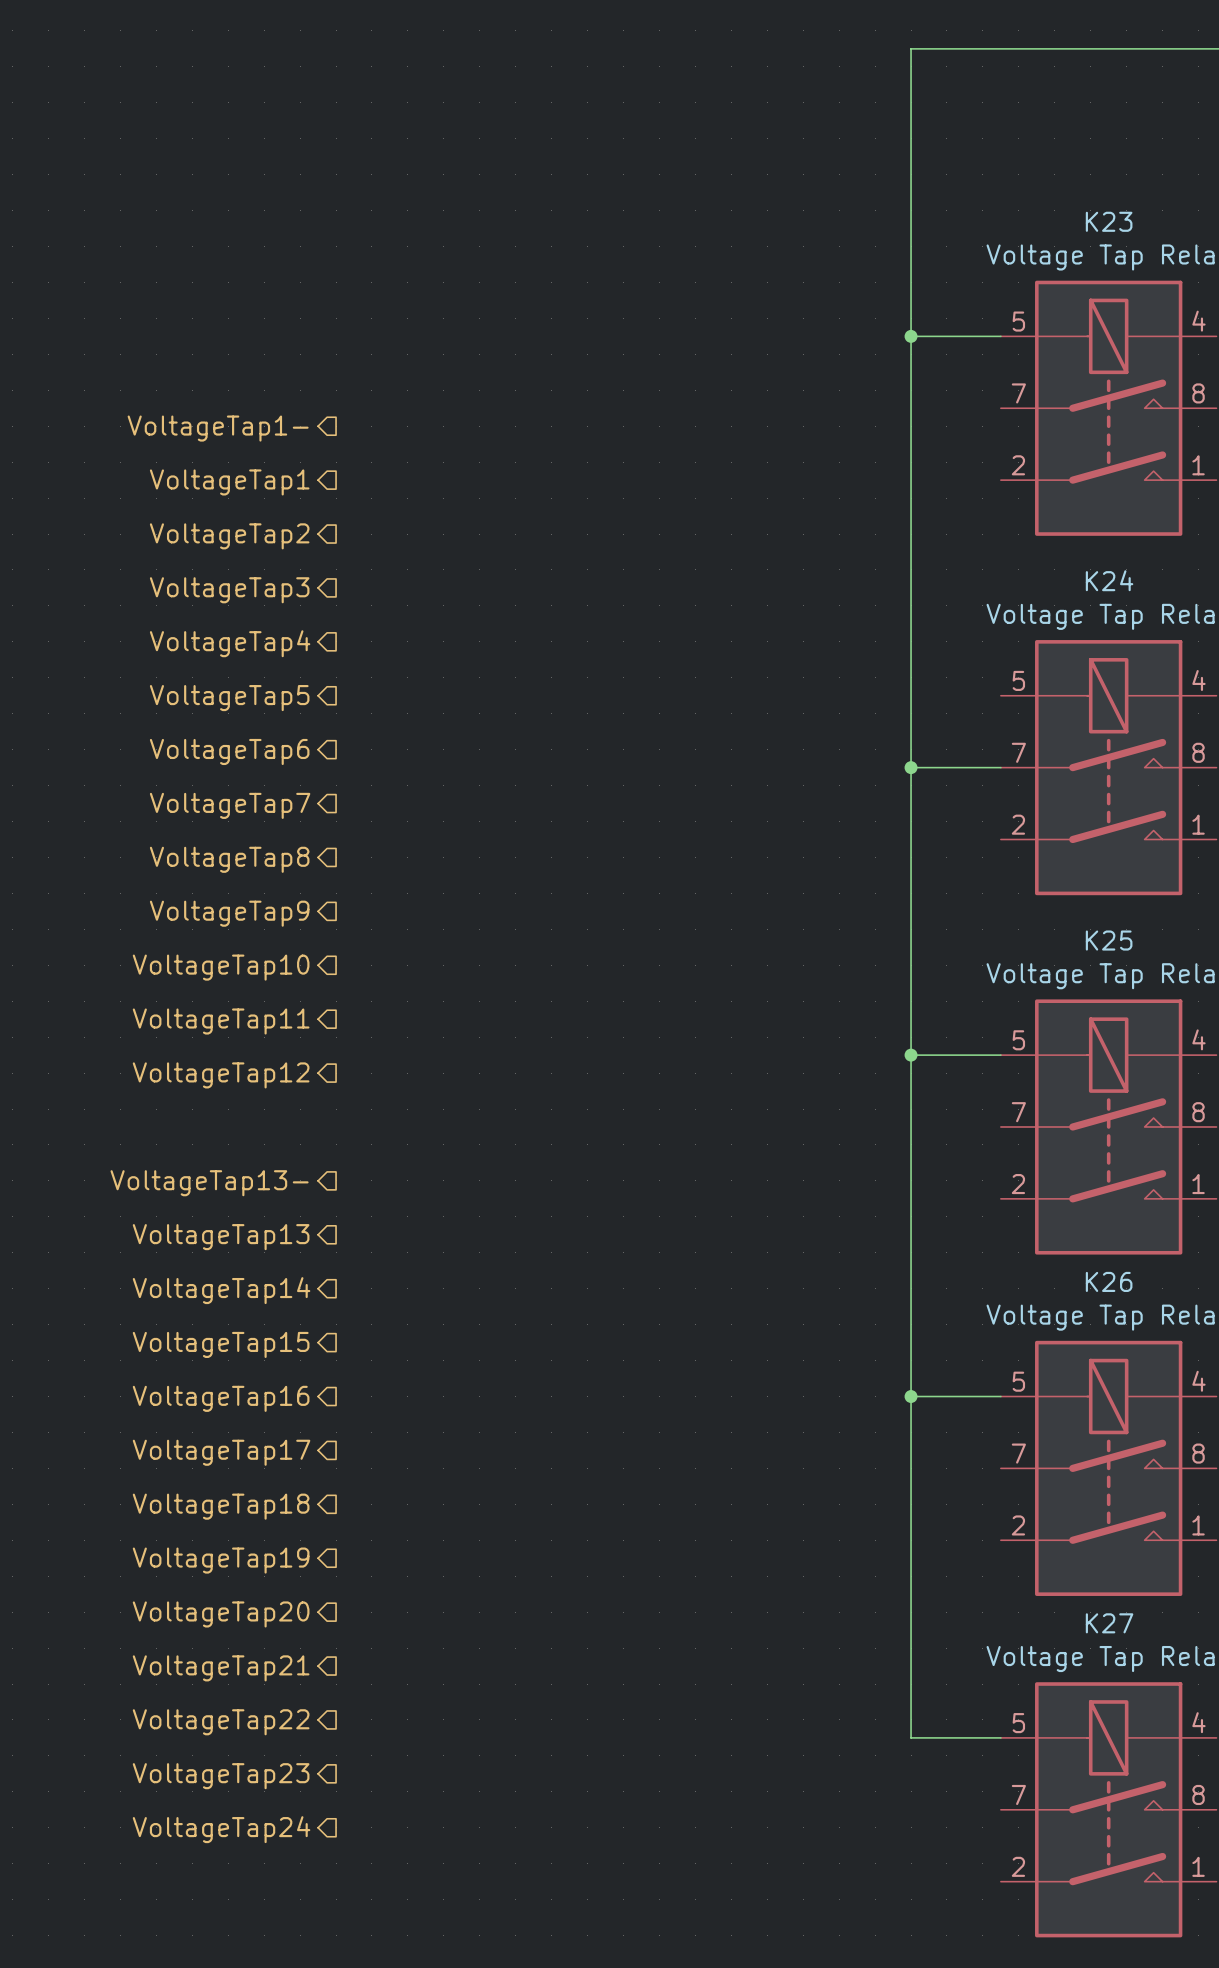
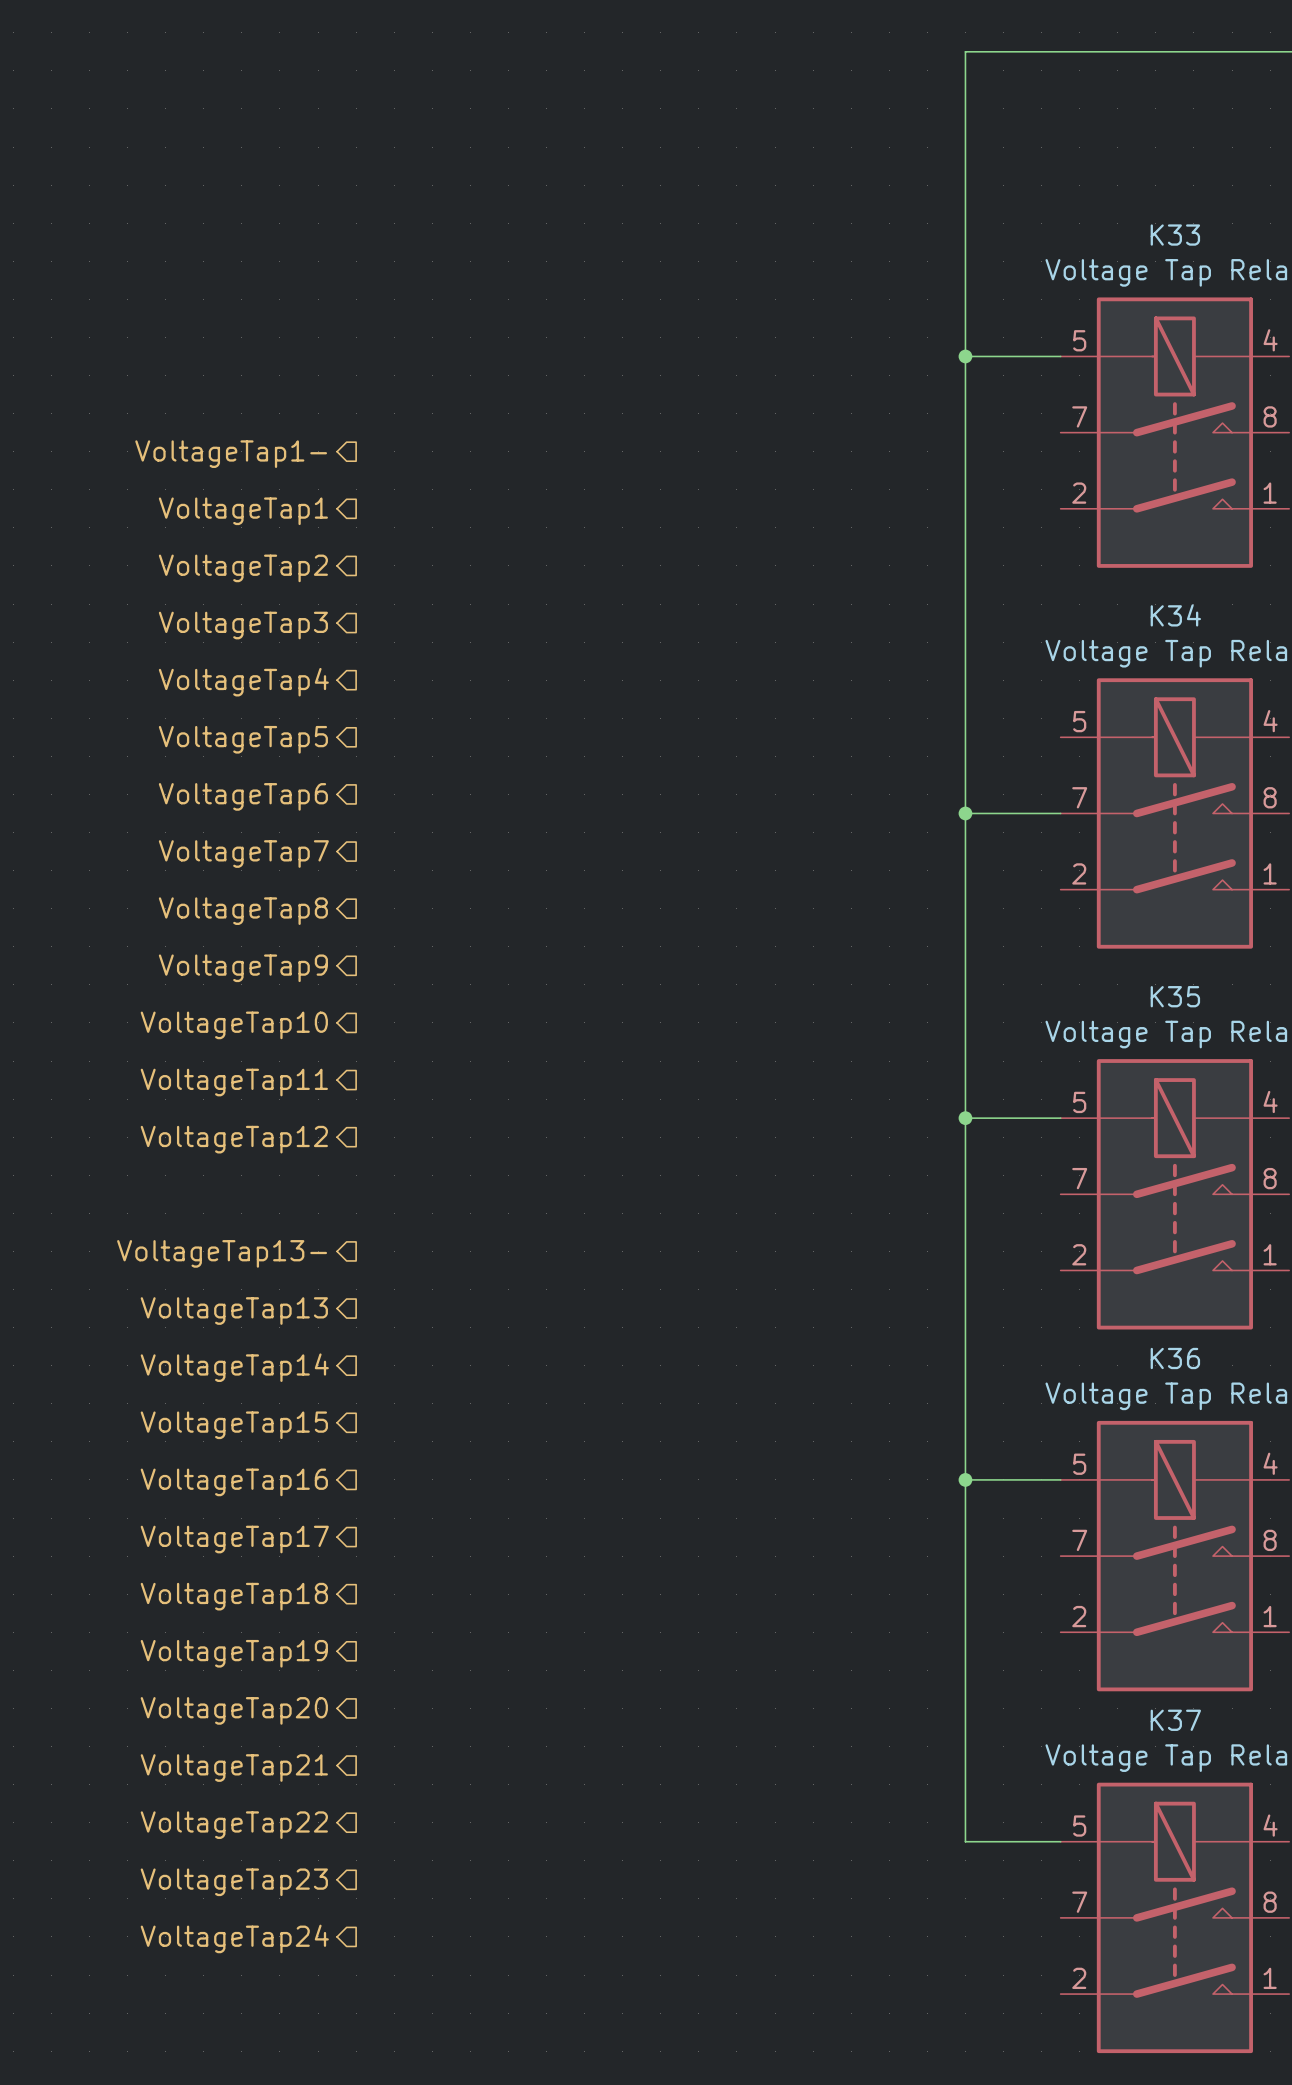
K23 name: K23 (1109, 221) -> K33 (1175, 235)
K24 name: K24 (1109, 580) -> K34 (1175, 615)
K25 name: K25 (1109, 940) -> K35 (1175, 996)
K26 name: K26 (1109, 1281) -> K36 (1175, 1358)
K27 name: K27 (1109, 1623) -> K37 (1175, 1720)

